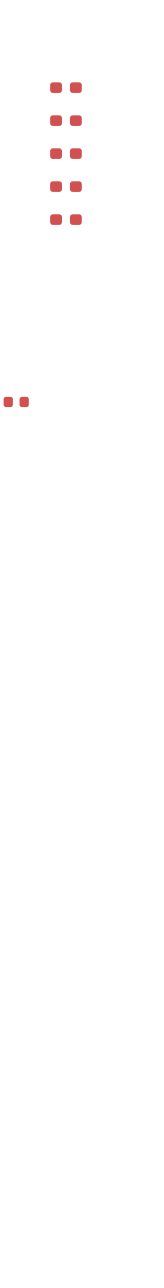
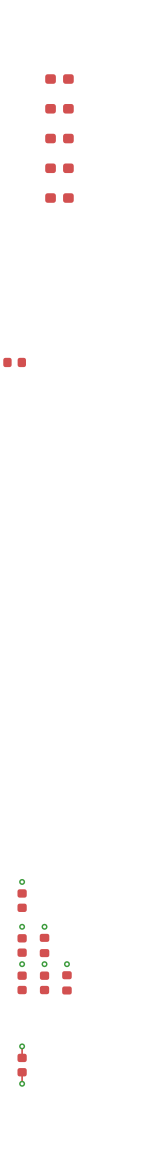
via: none -> (22, 881)
part: none -> (22, 900)
via: none -> (22, 926)
via: none -> (44, 926)
part: none -> (22, 945)
part: none -> (44, 945)
via: none -> (22, 964)
via: none -> (44, 964)
via: none -> (66, 964)
part: none -> (22, 982)
part: none -> (44, 982)
part: none -> (66, 982)
top track: none -> (22, 1046) (22, 1057)
via: none -> (22, 1046)
part: none -> (22, 1065)
top track: none -> (22, 1072) (22, 1083)
via: none -> (22, 1083)

